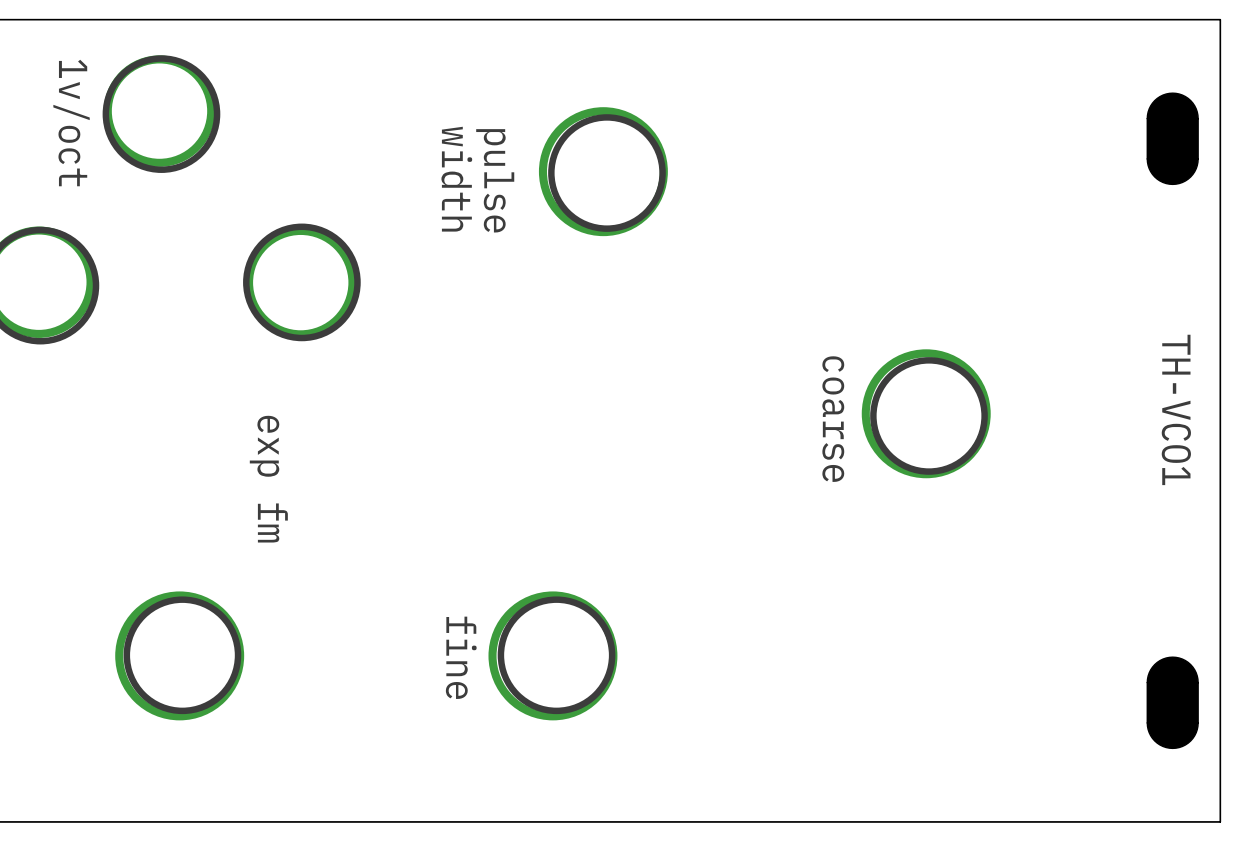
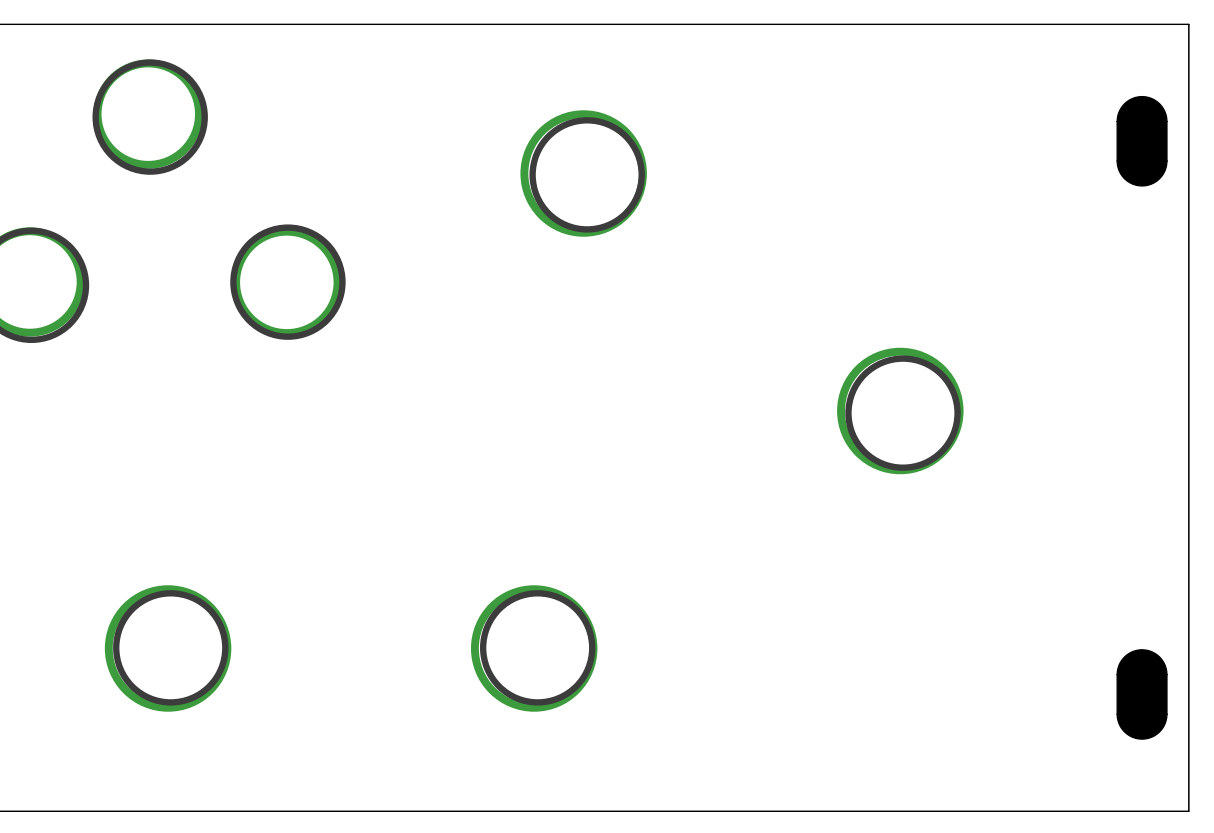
text: 1v/oct (71, 123) -> none
text: width (456, 179) -> none
text: pulse (495, 180) -> none
text: TH-VCO1 (1176, 409) -> none
text: coarse (833, 419) -> none
text: exp fm (268, 479) -> none
text: fine (461, 657) -> none

